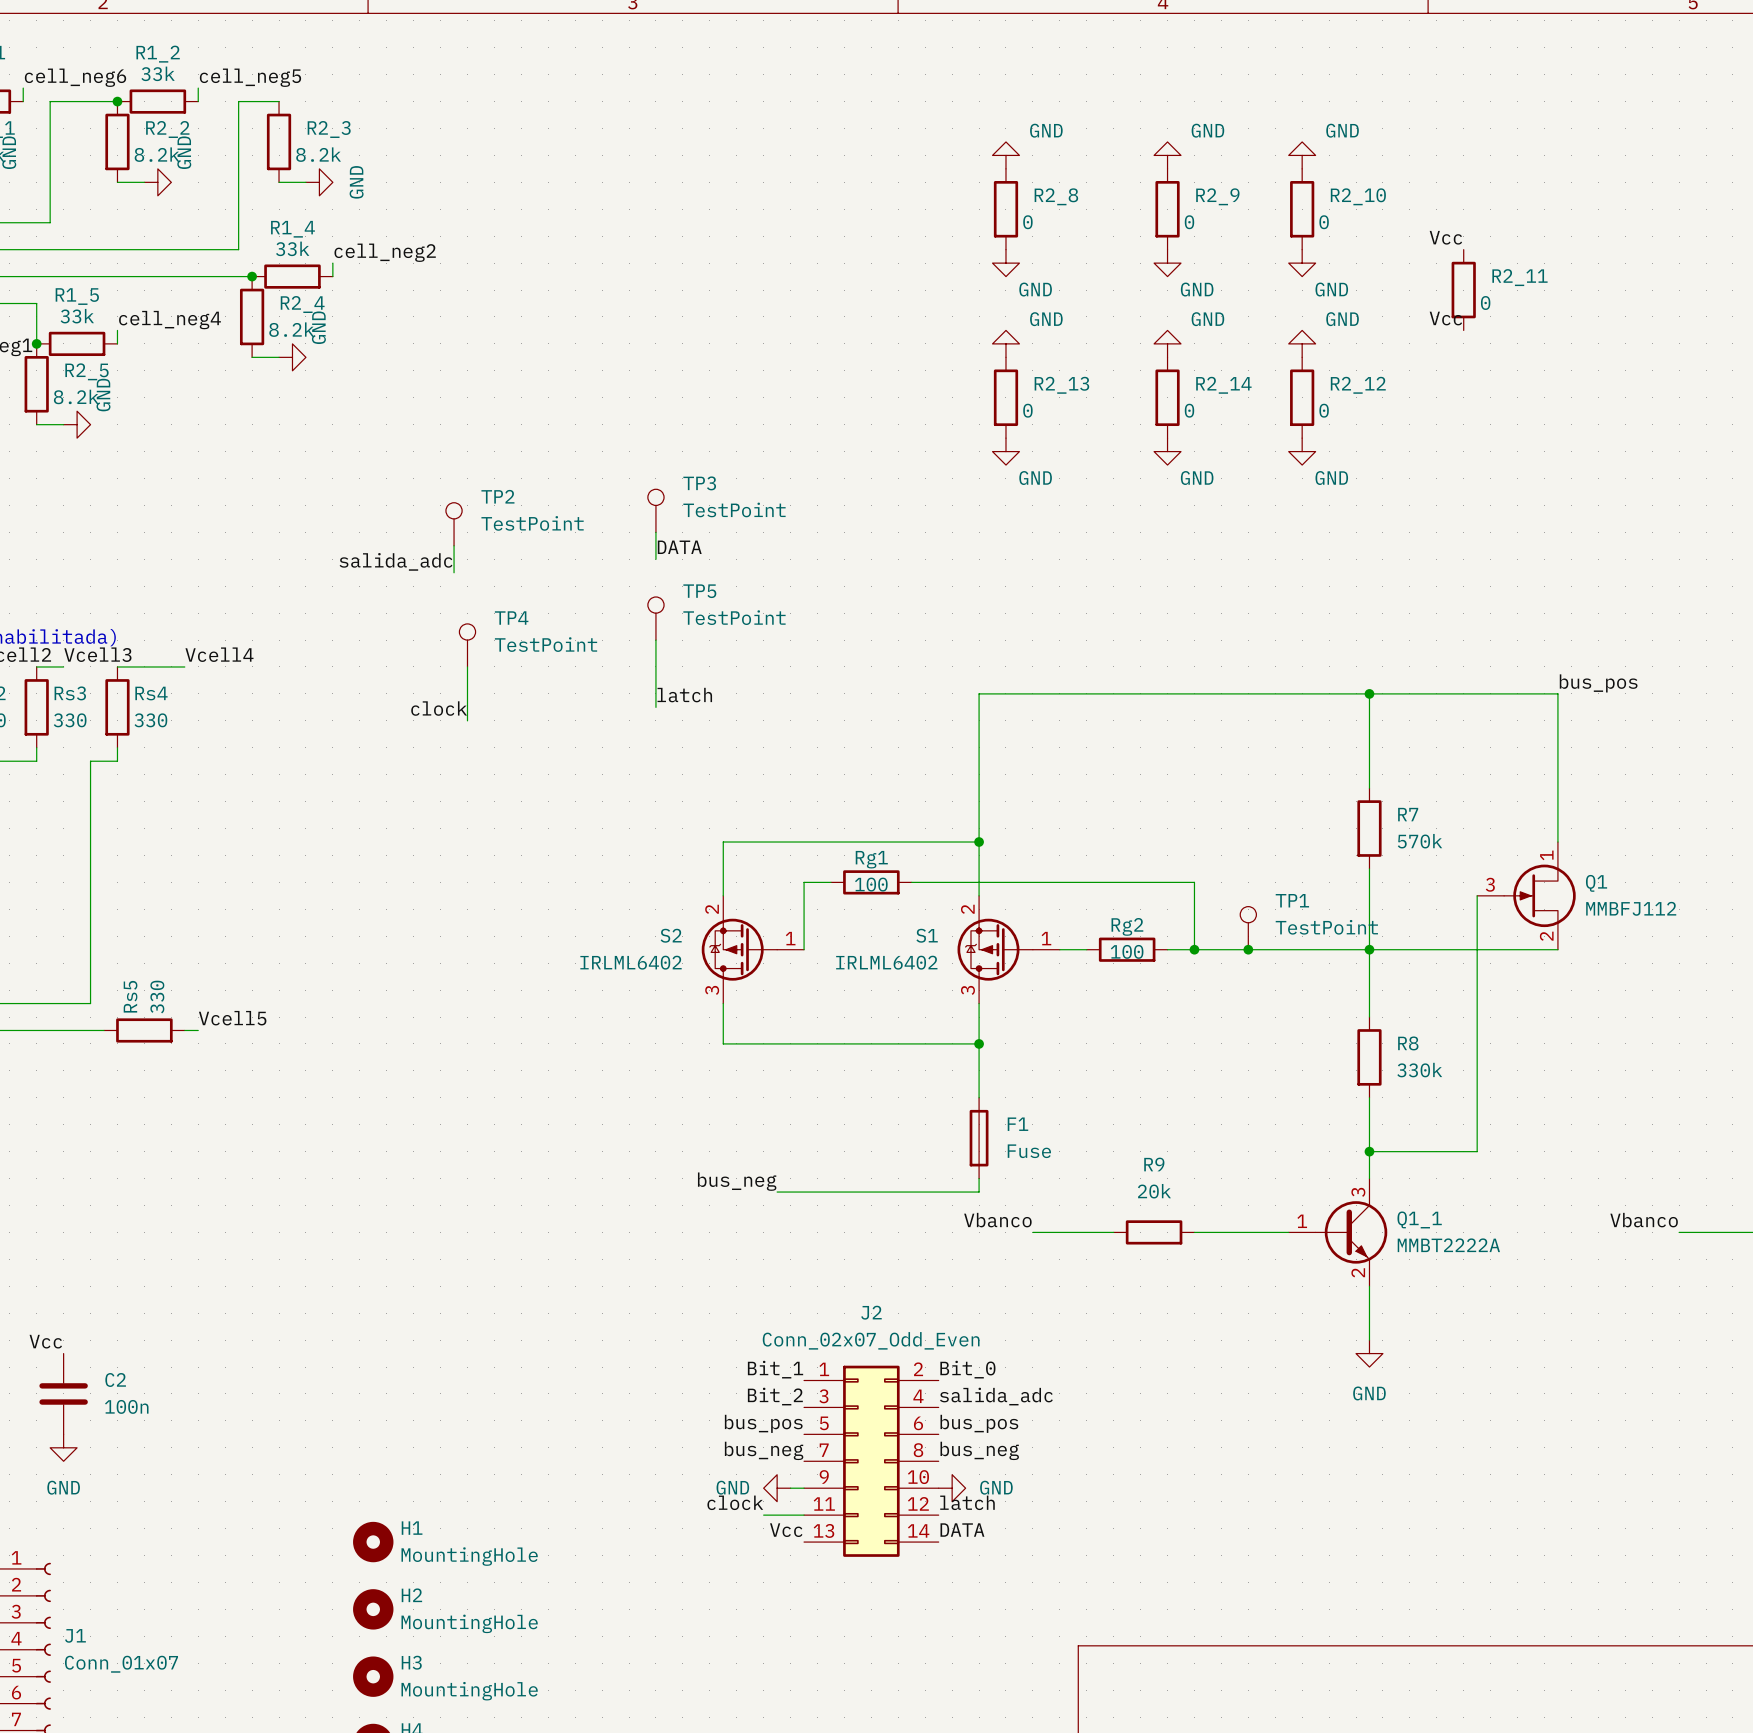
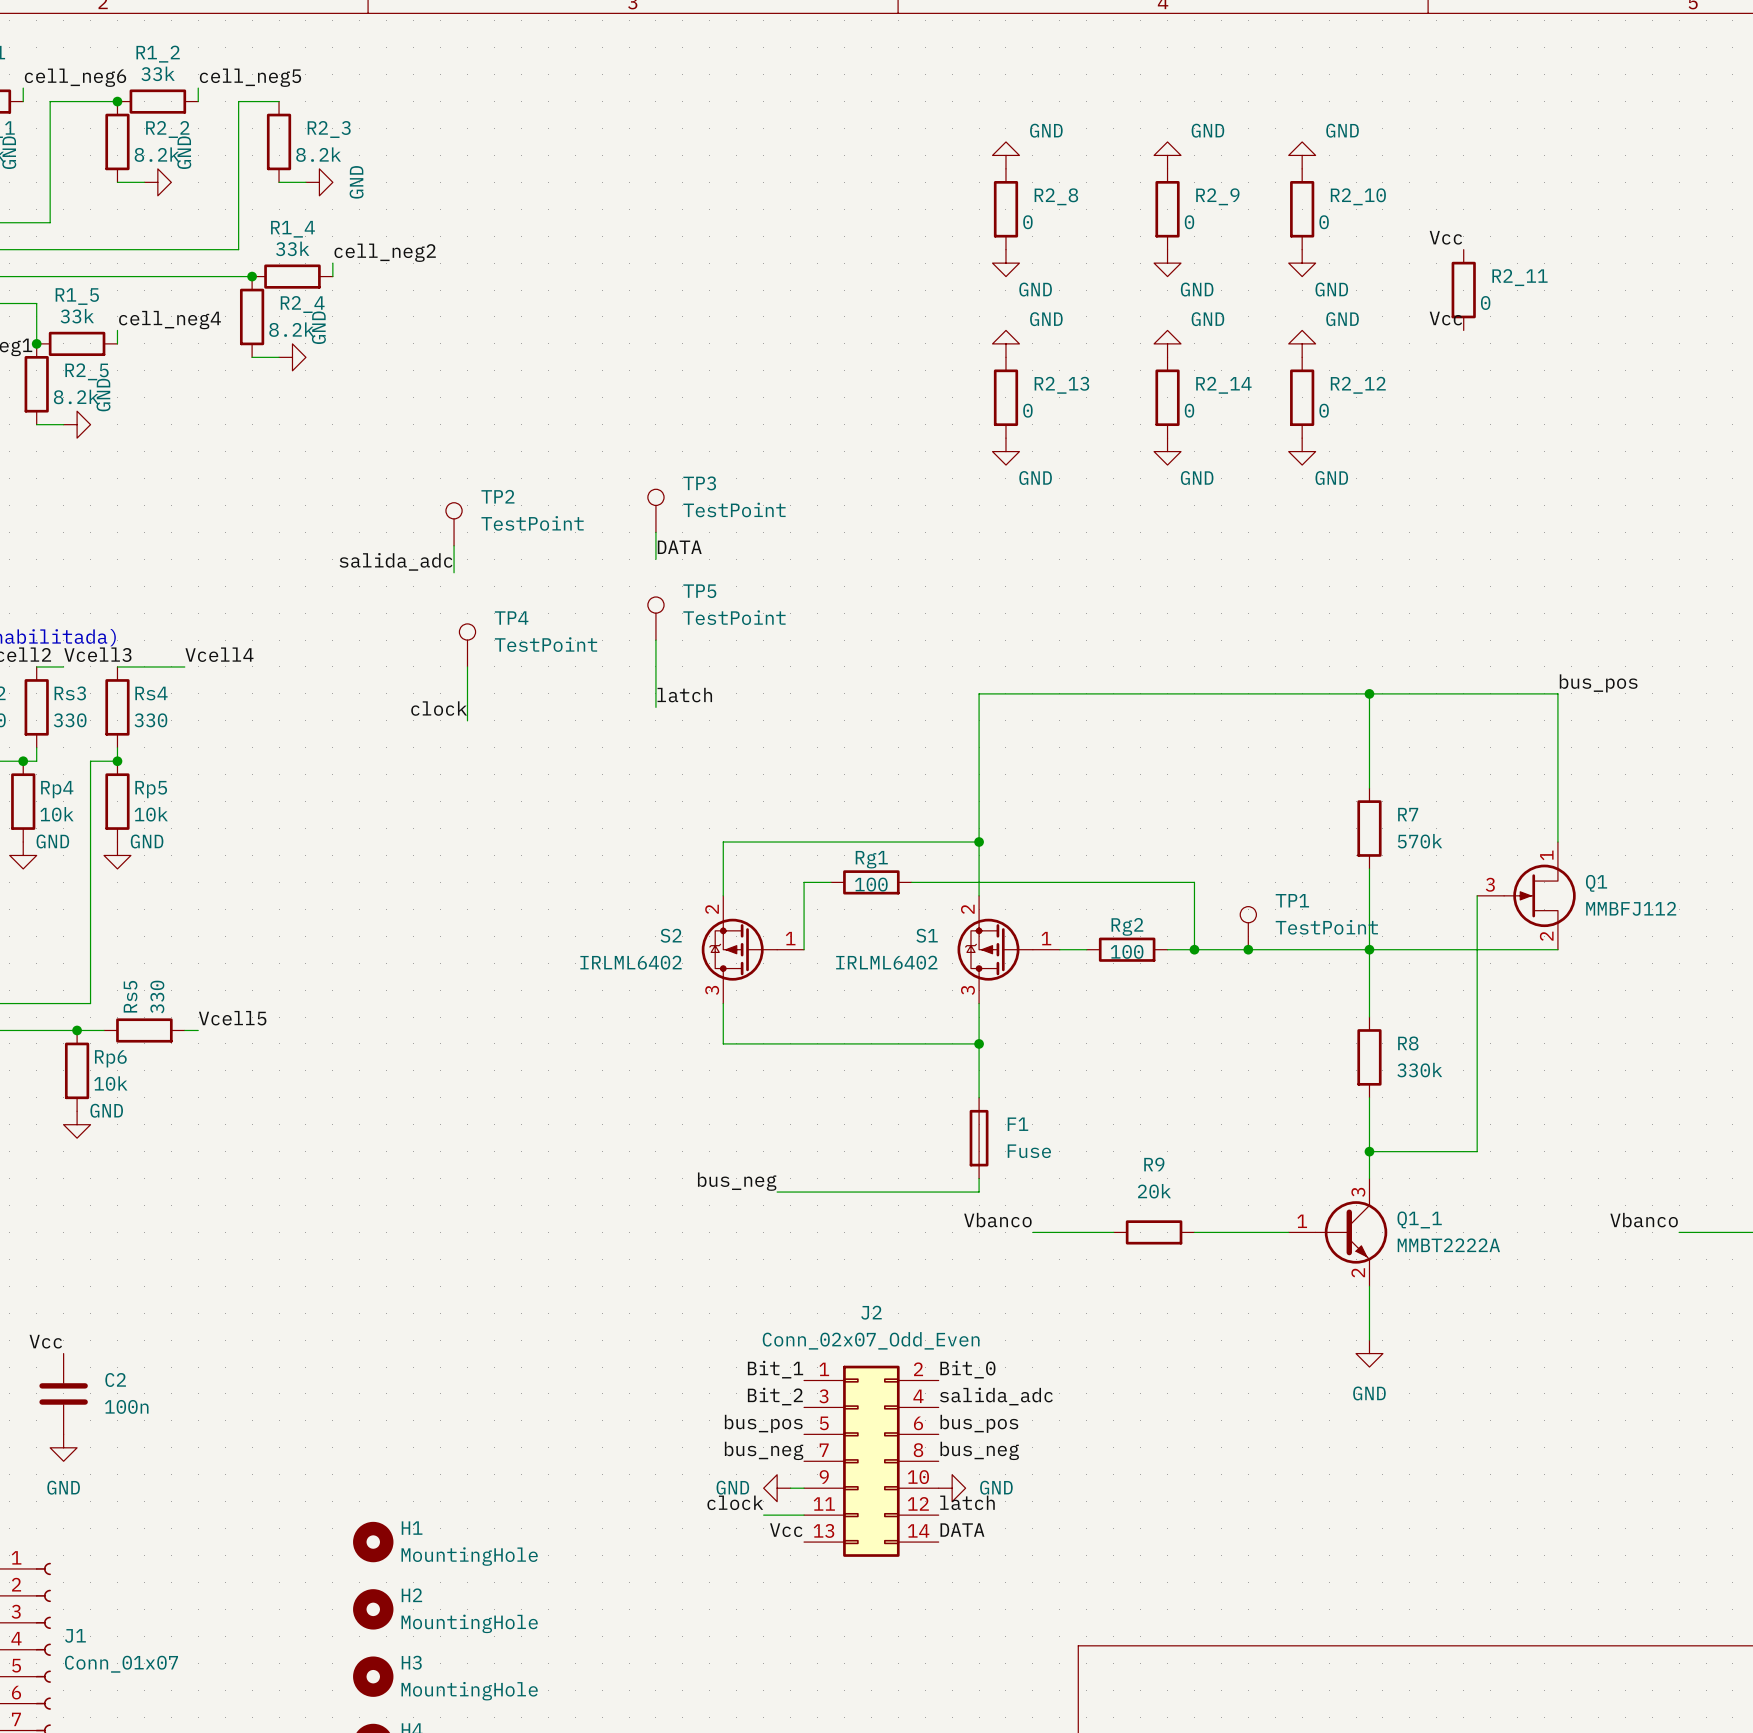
junction: none -> (23, 761)
junction: none -> (117, 761)
Rp4: none -> 10k (23, 801)
Rp5: none -> 10k (117, 801)
power symbol: none -> GND (23, 855)
power symbol: none -> GND (117, 855)
junction: none -> (77, 1030)
Rp6: none -> 10k (77, 1070)
power symbol: none -> GND (77, 1124)

